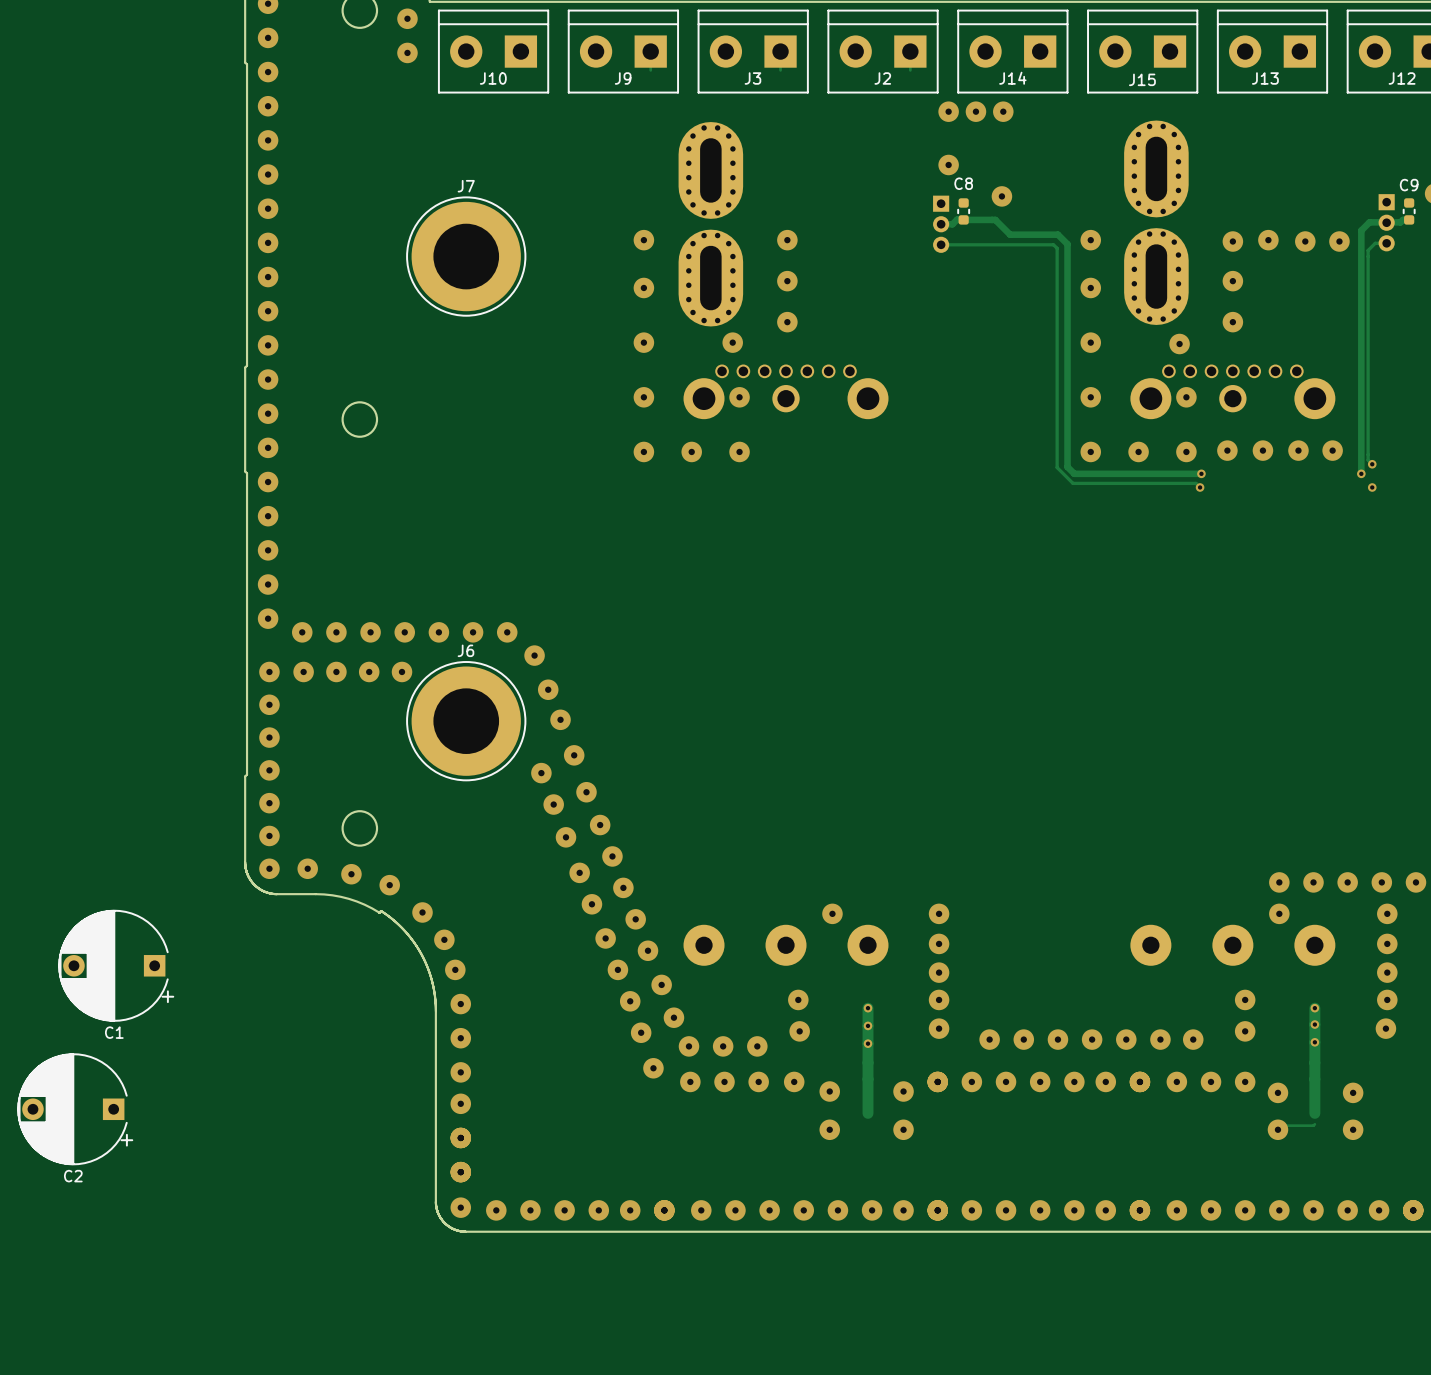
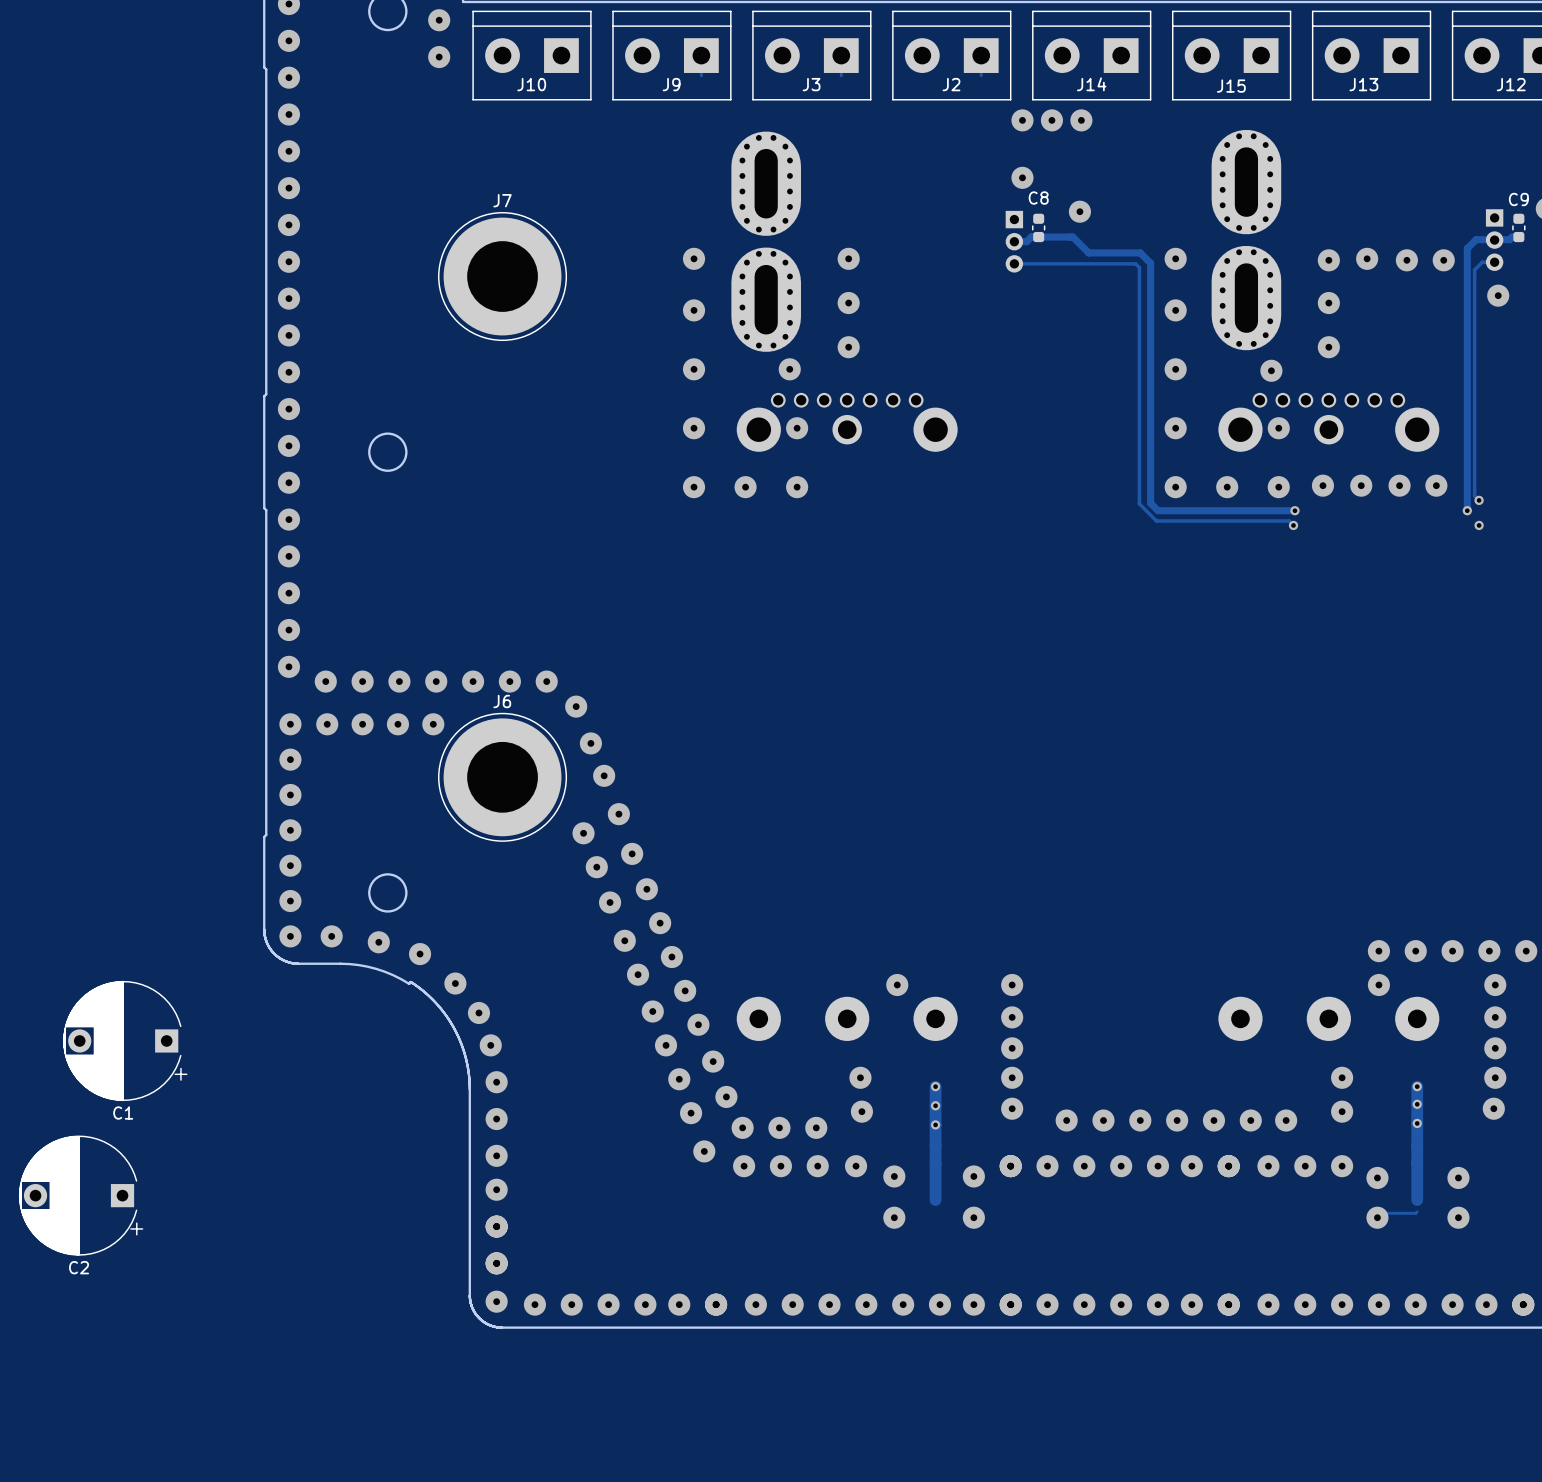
via: none -> (1498, 295)

